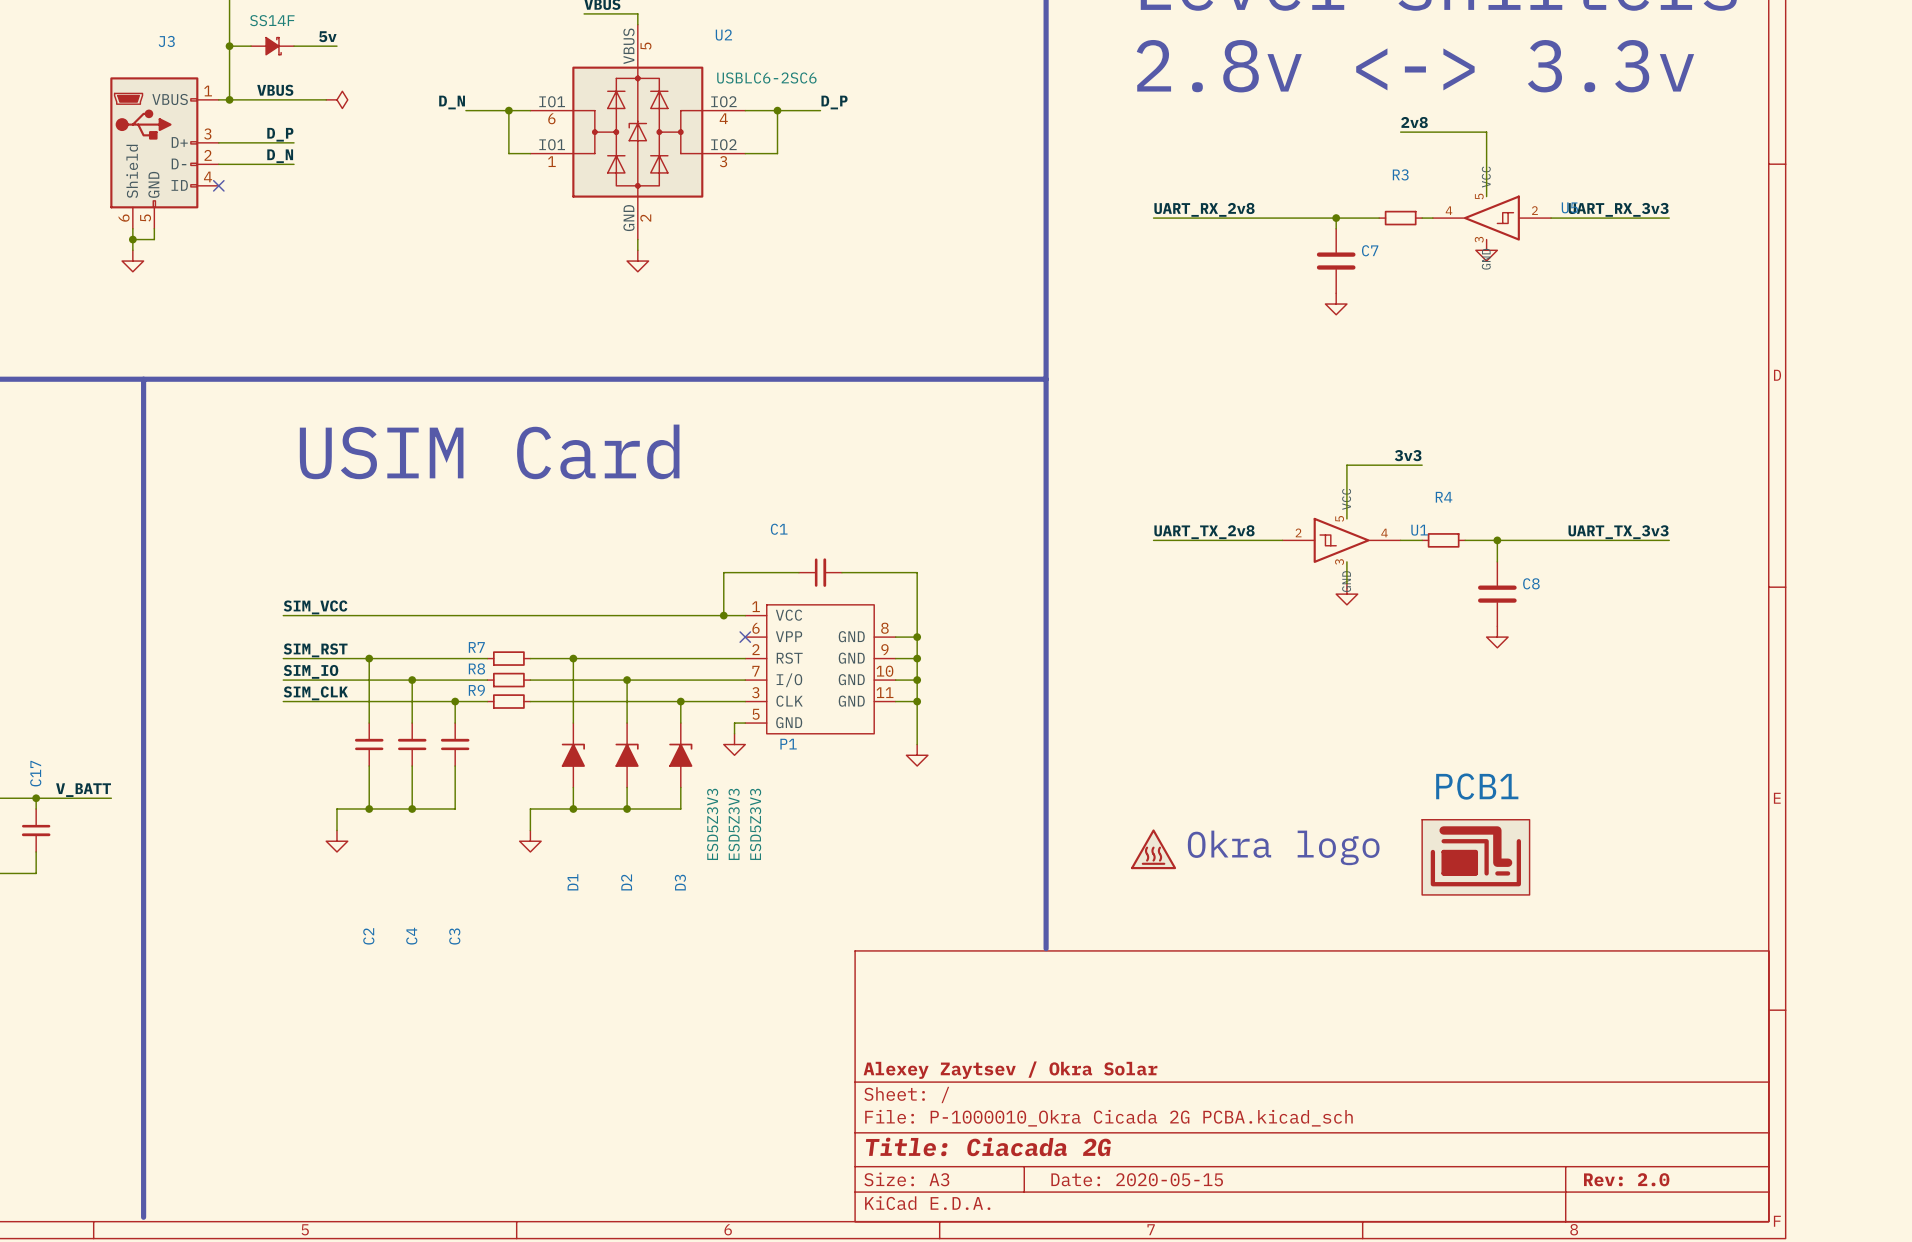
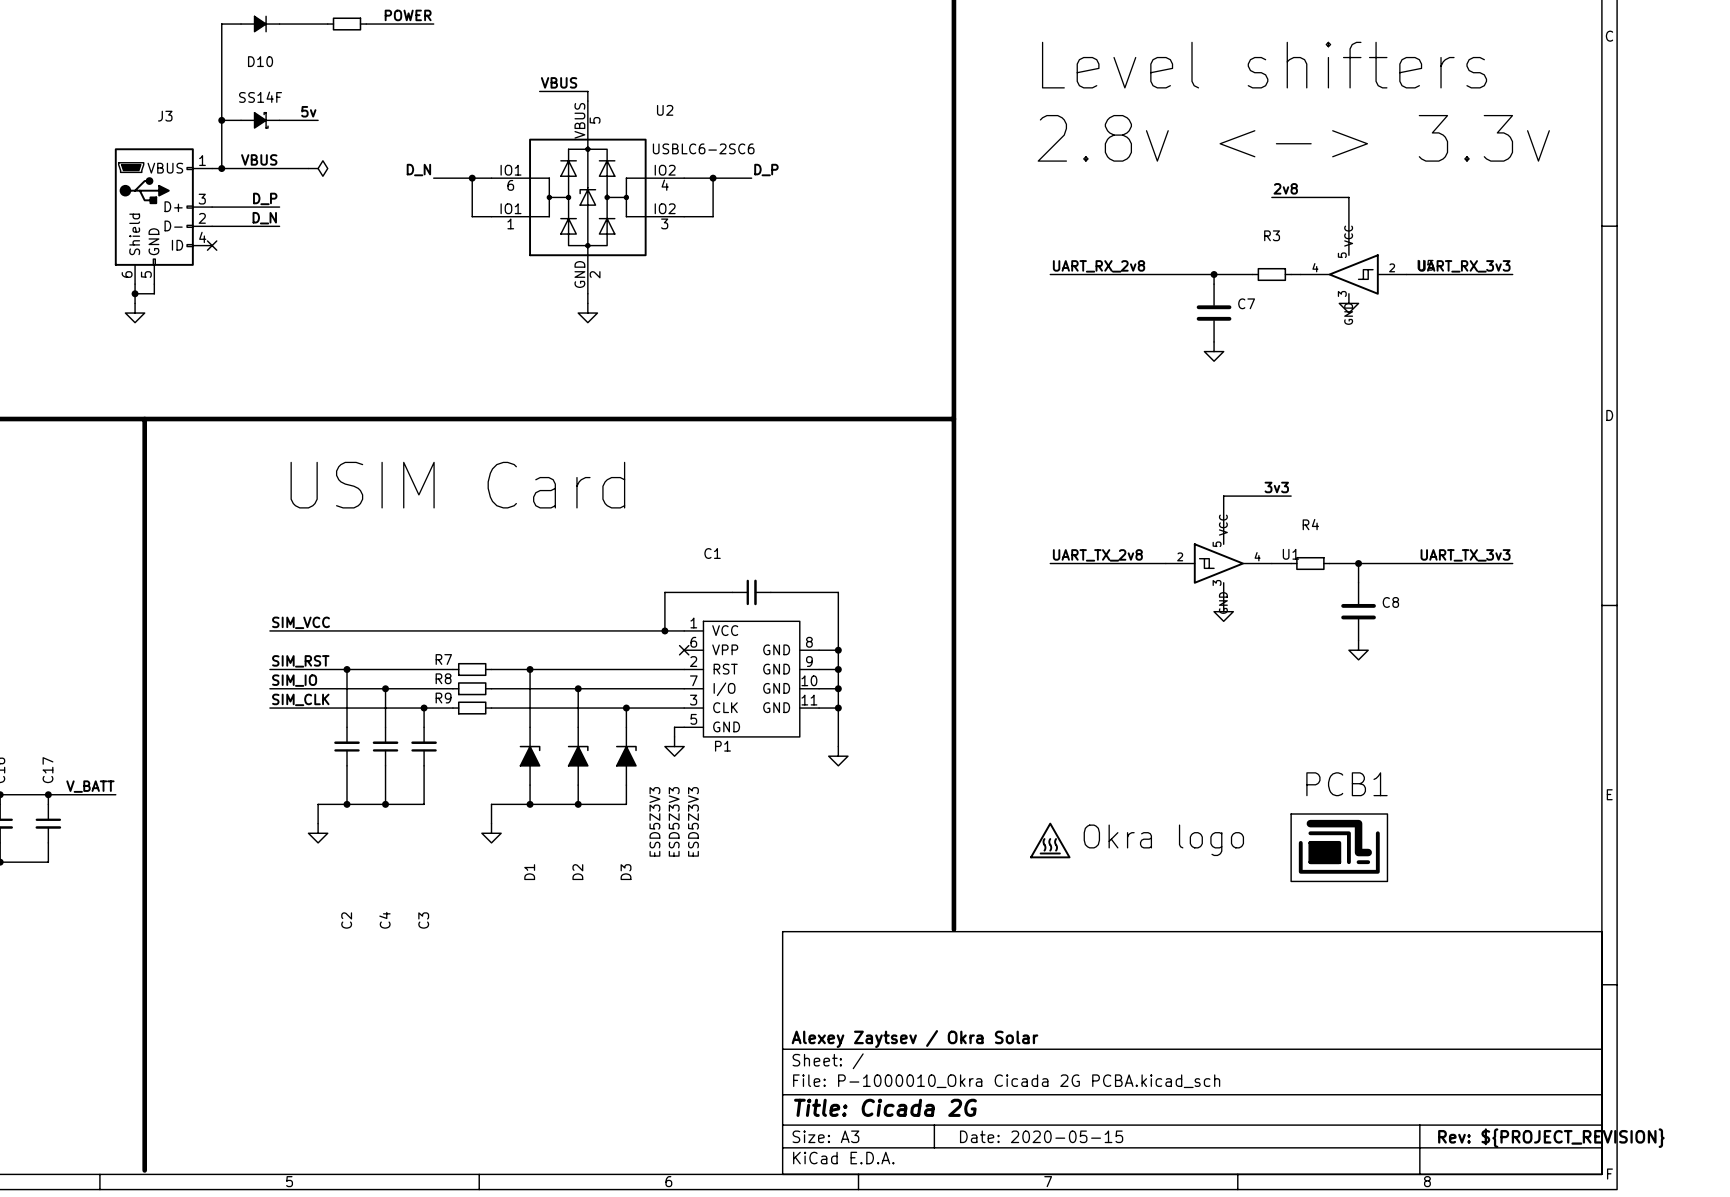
title block: Title: Ciacada 2G (988, 1146) -> Title: Cicada 2G (885, 1107)
title block: Rev: 2.0 (1626, 1179) -> Rev: ${PROJECT_REVISION} (1551, 1138)

